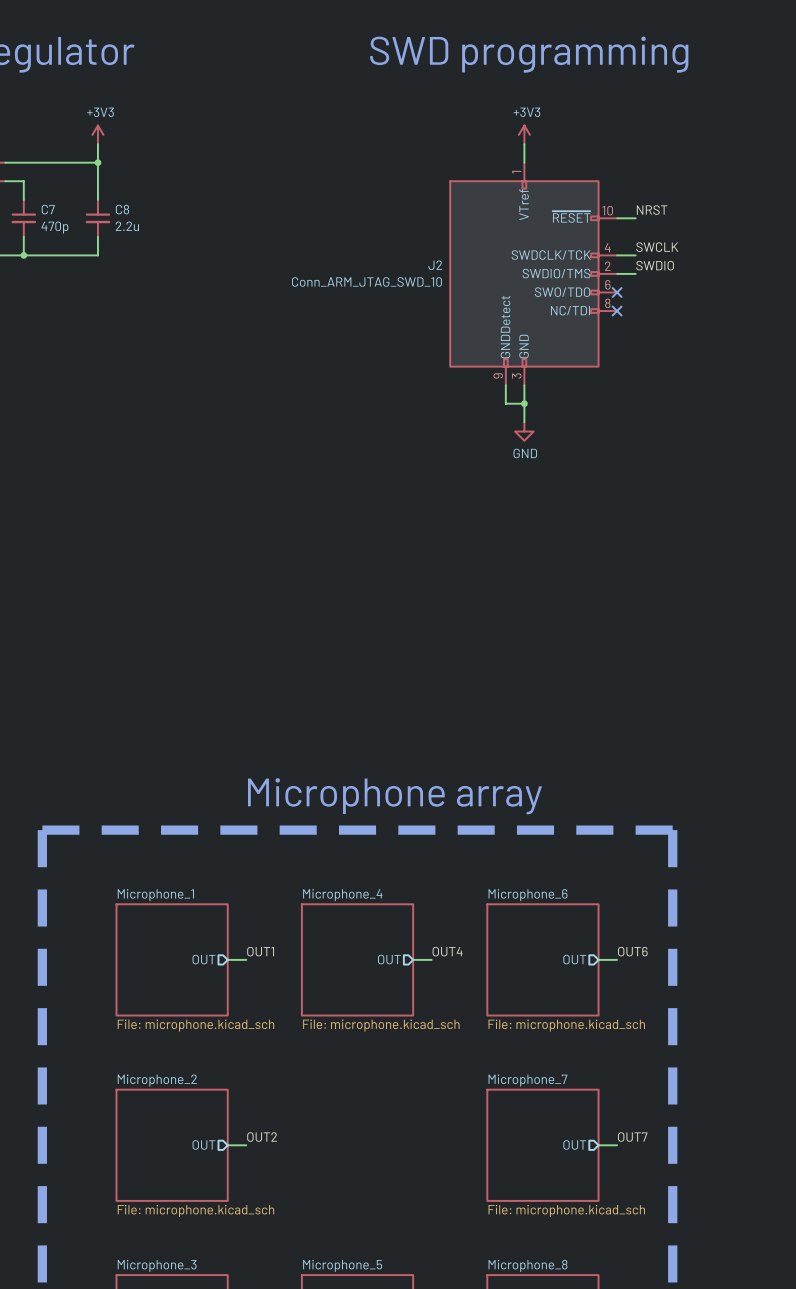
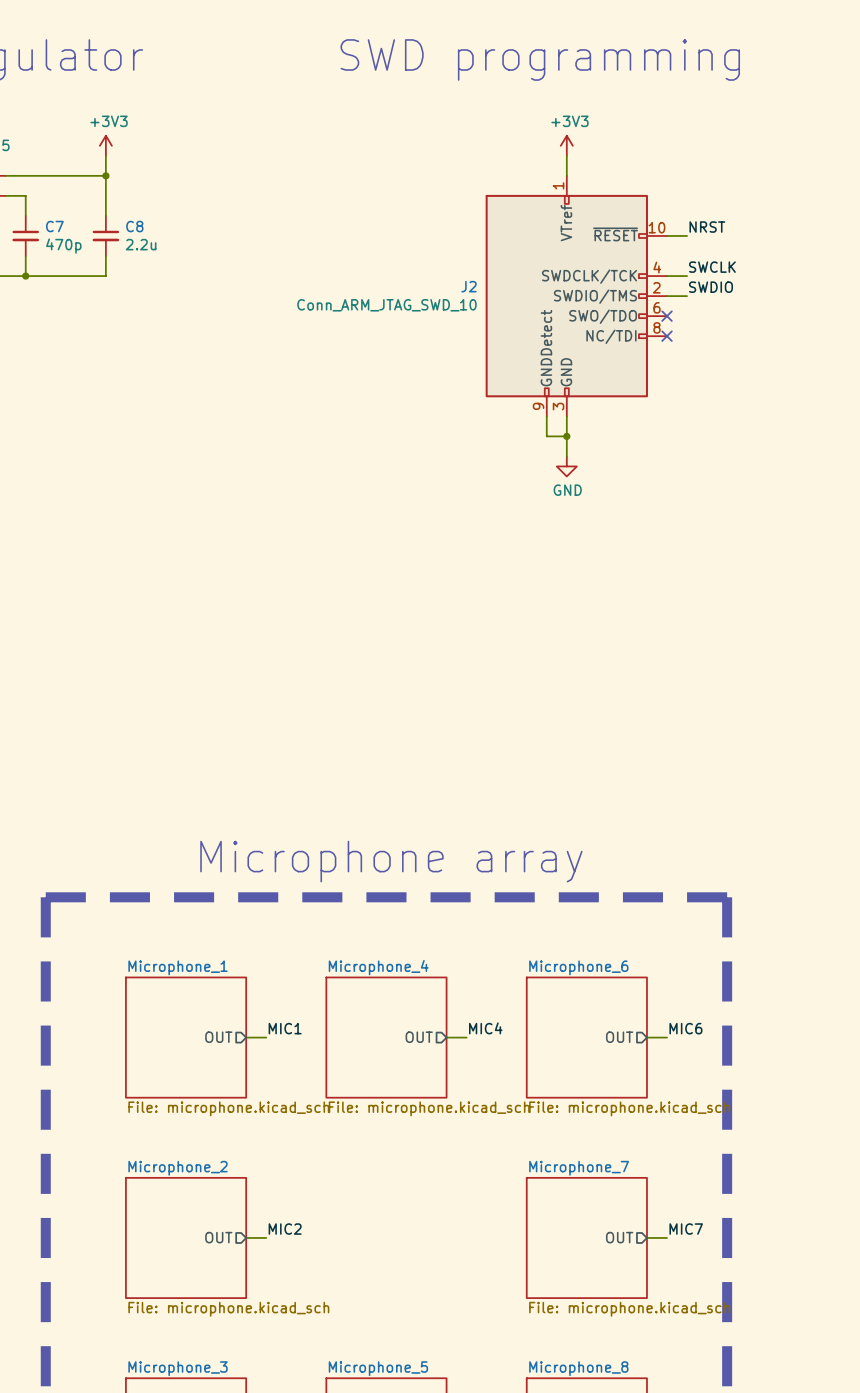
label: OUT1 (260, 951) -> MIC1 (285, 1028)
label: OUT4 (447, 951) -> MIC4 (485, 1028)
label: OUT6 (632, 951) -> MIC6 (685, 1028)
label: OUT2 (262, 1137) -> MIC2 (285, 1229)
label: OUT7 (632, 1137) -> MIC7 (686, 1229)

